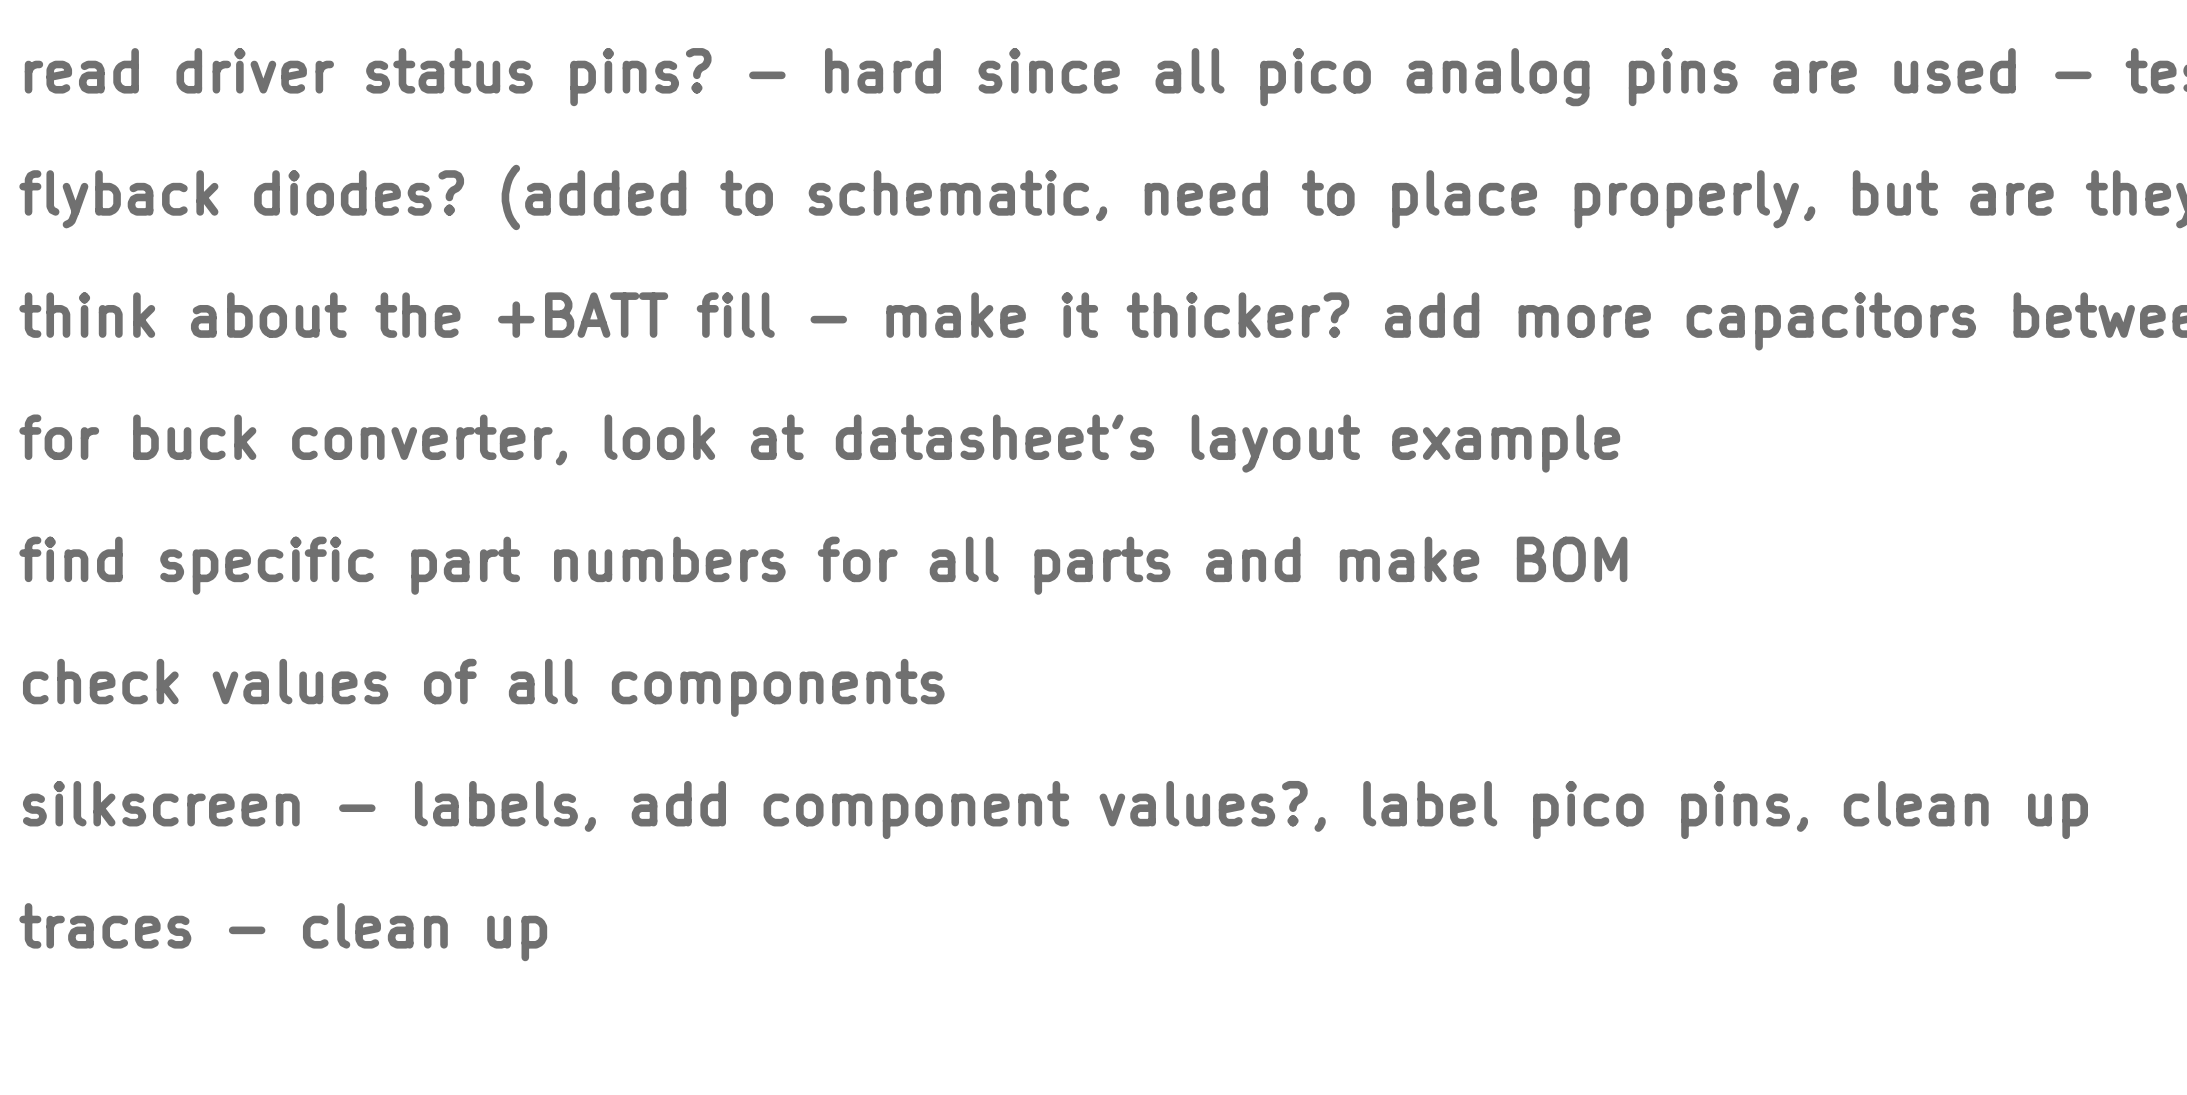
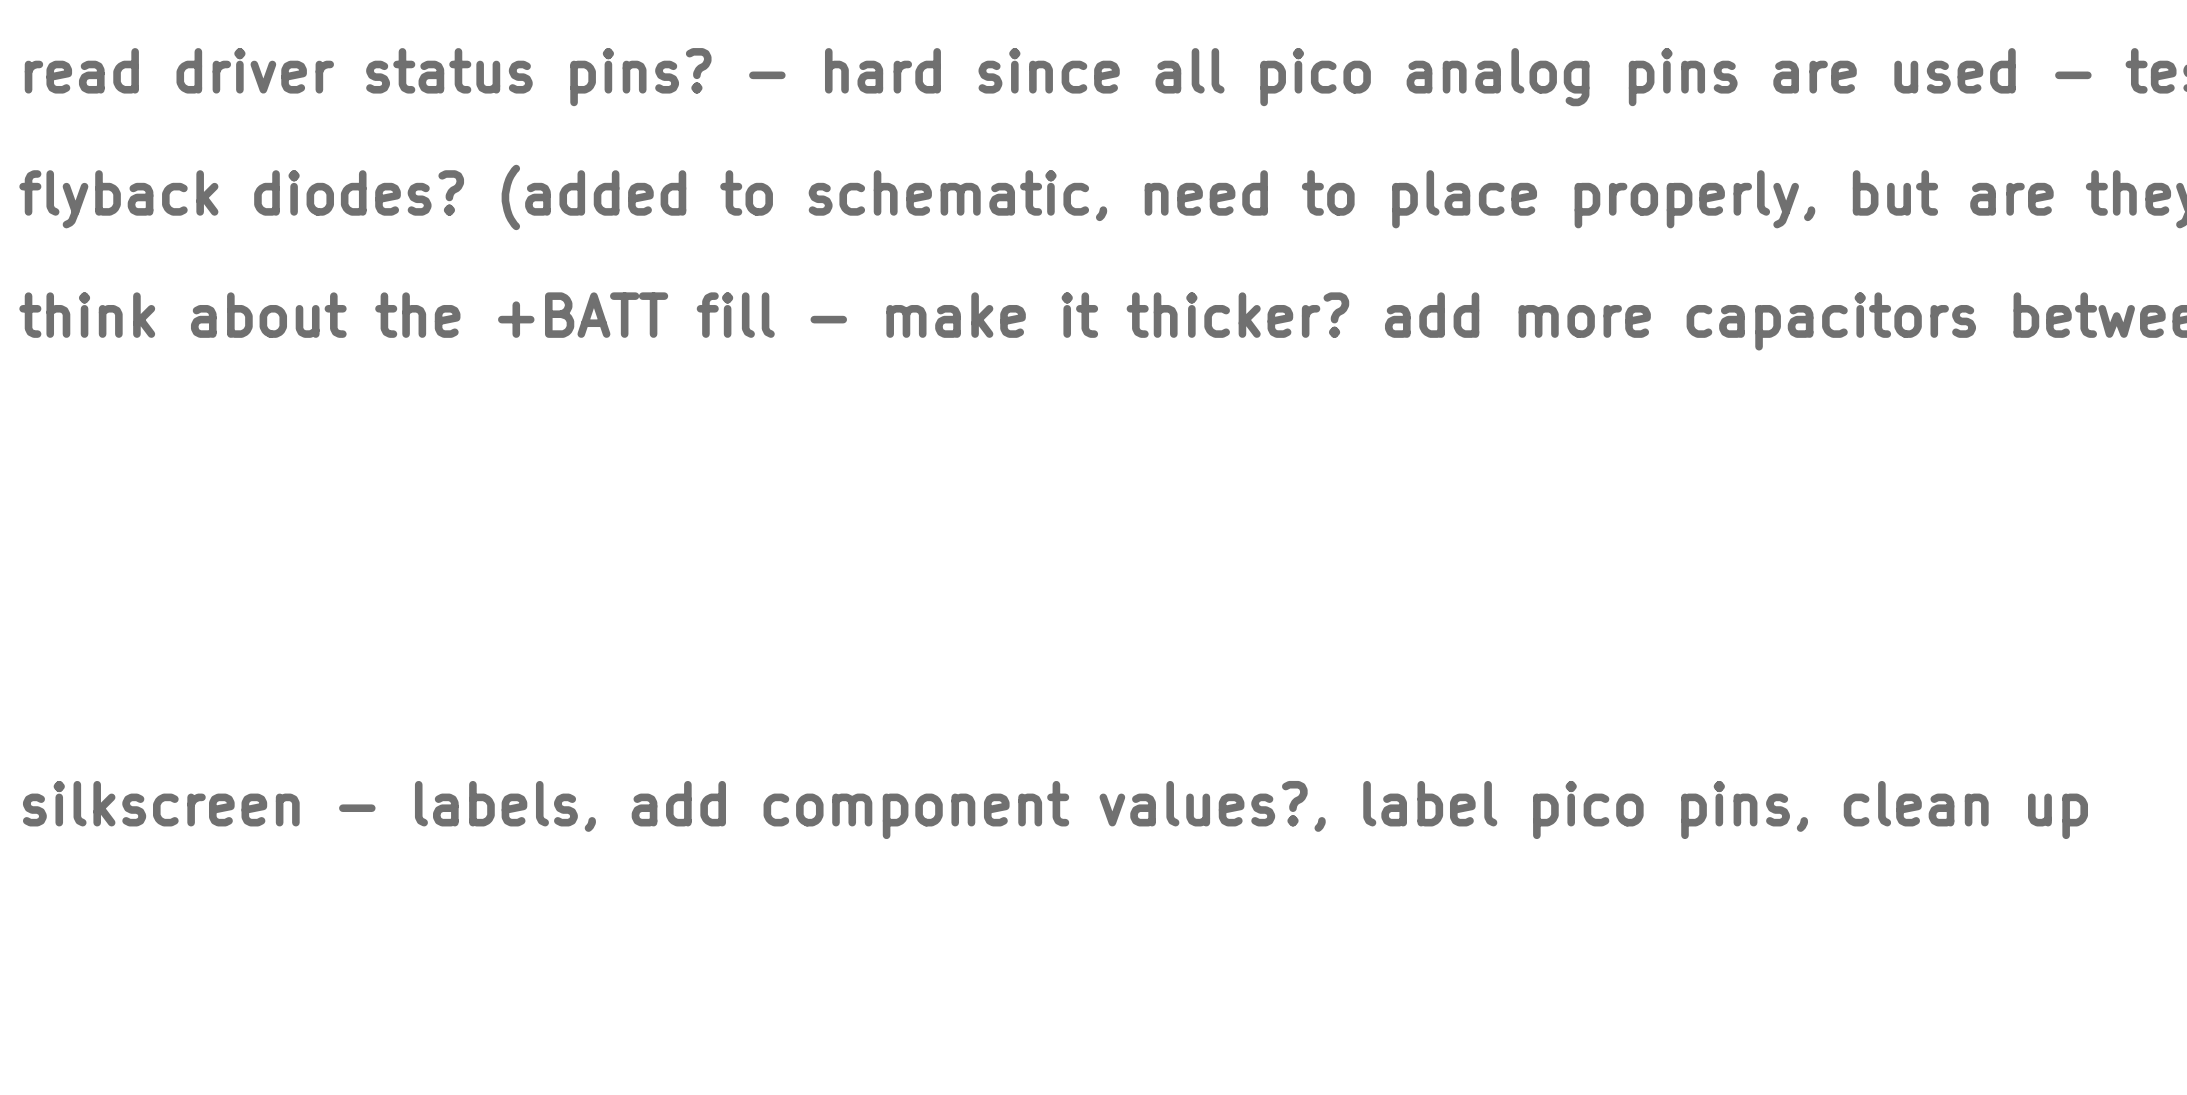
text: for buck converter, look at datasheet's layout example (819, 443) -> none
text: find specific part numbers for all parts and make BOM (823, 565) -> none
text: check values of all components (483, 687) -> none
text: traces - clean up (283, 932) -> none

